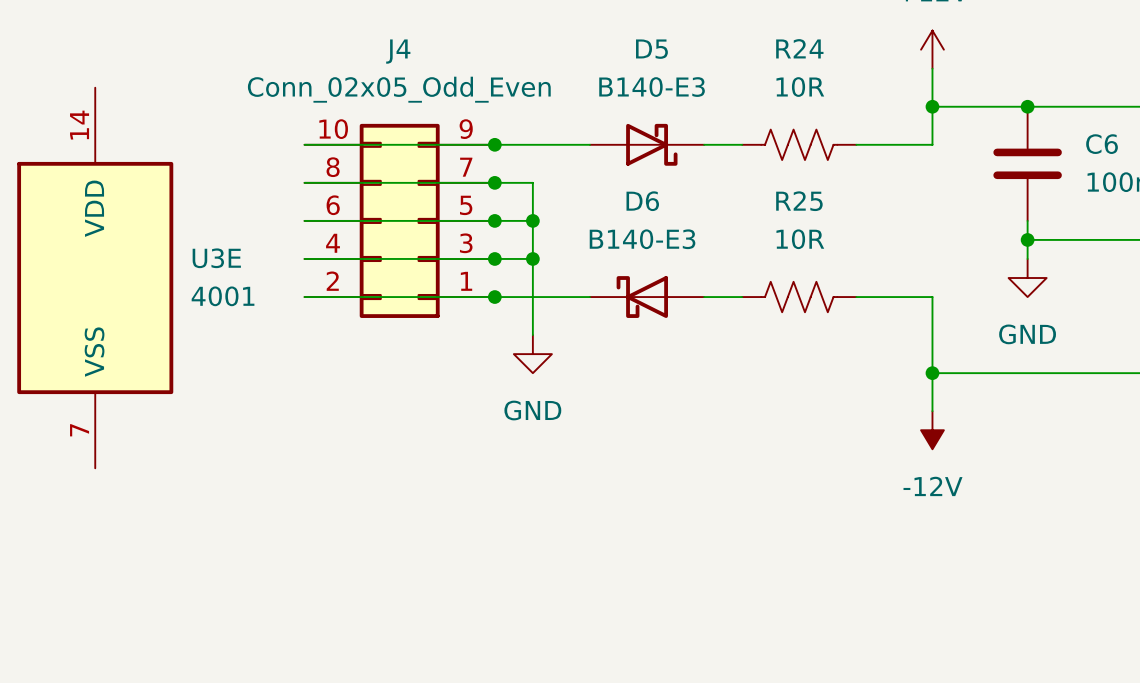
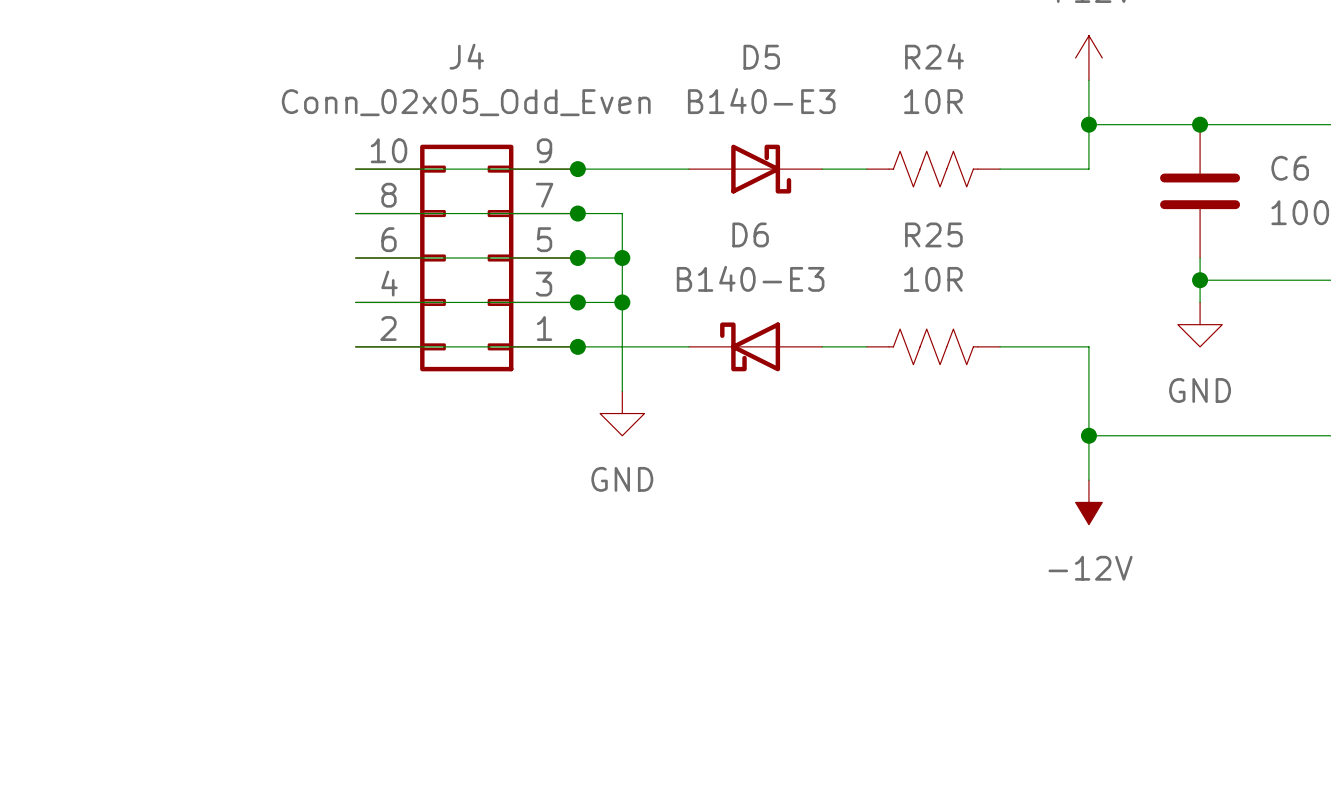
U3E: 4001 (95, 278) -> none

